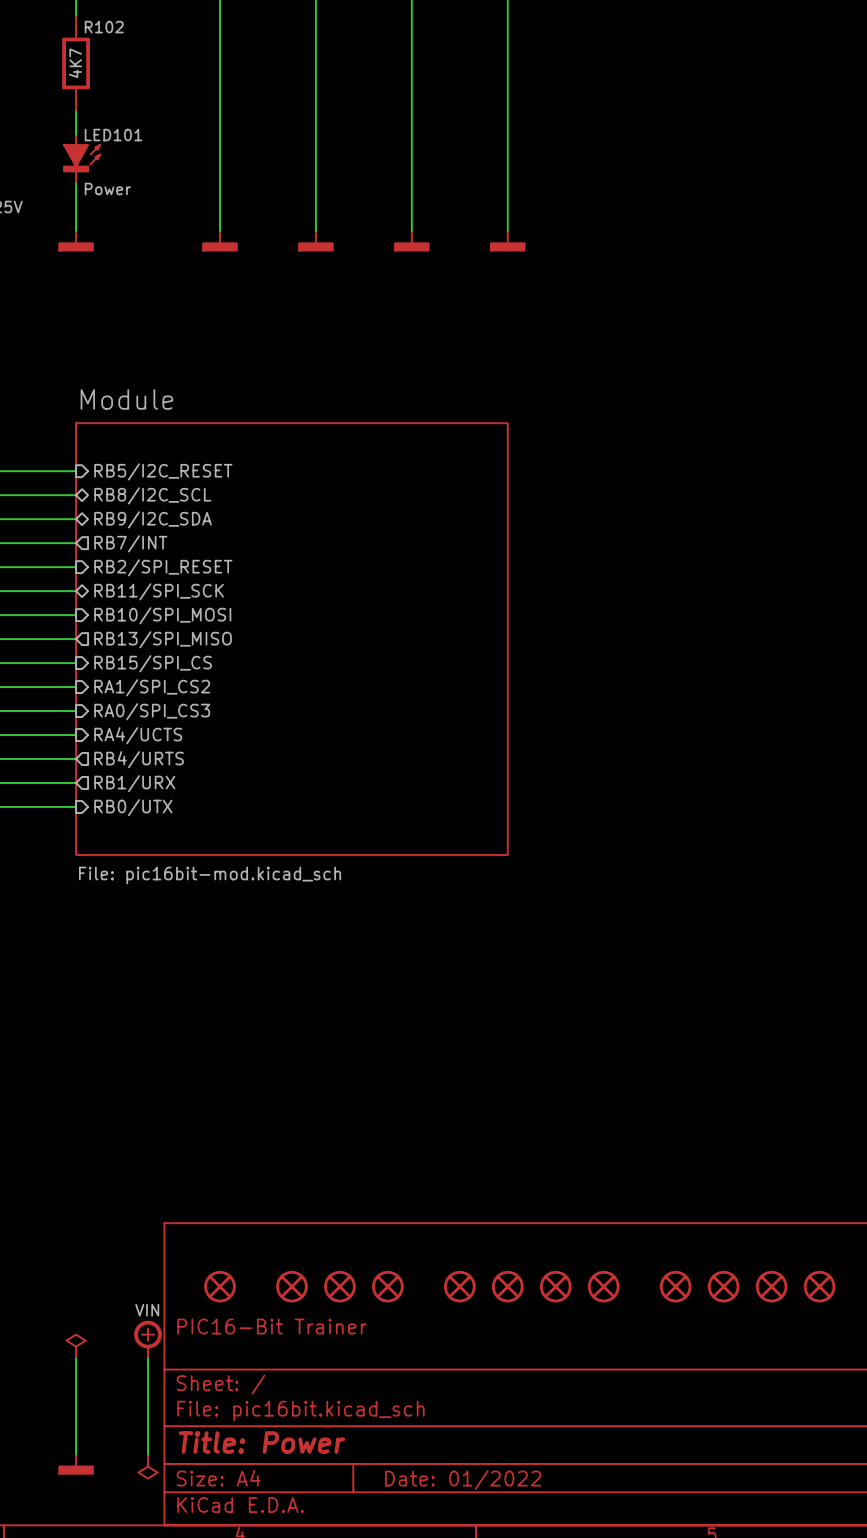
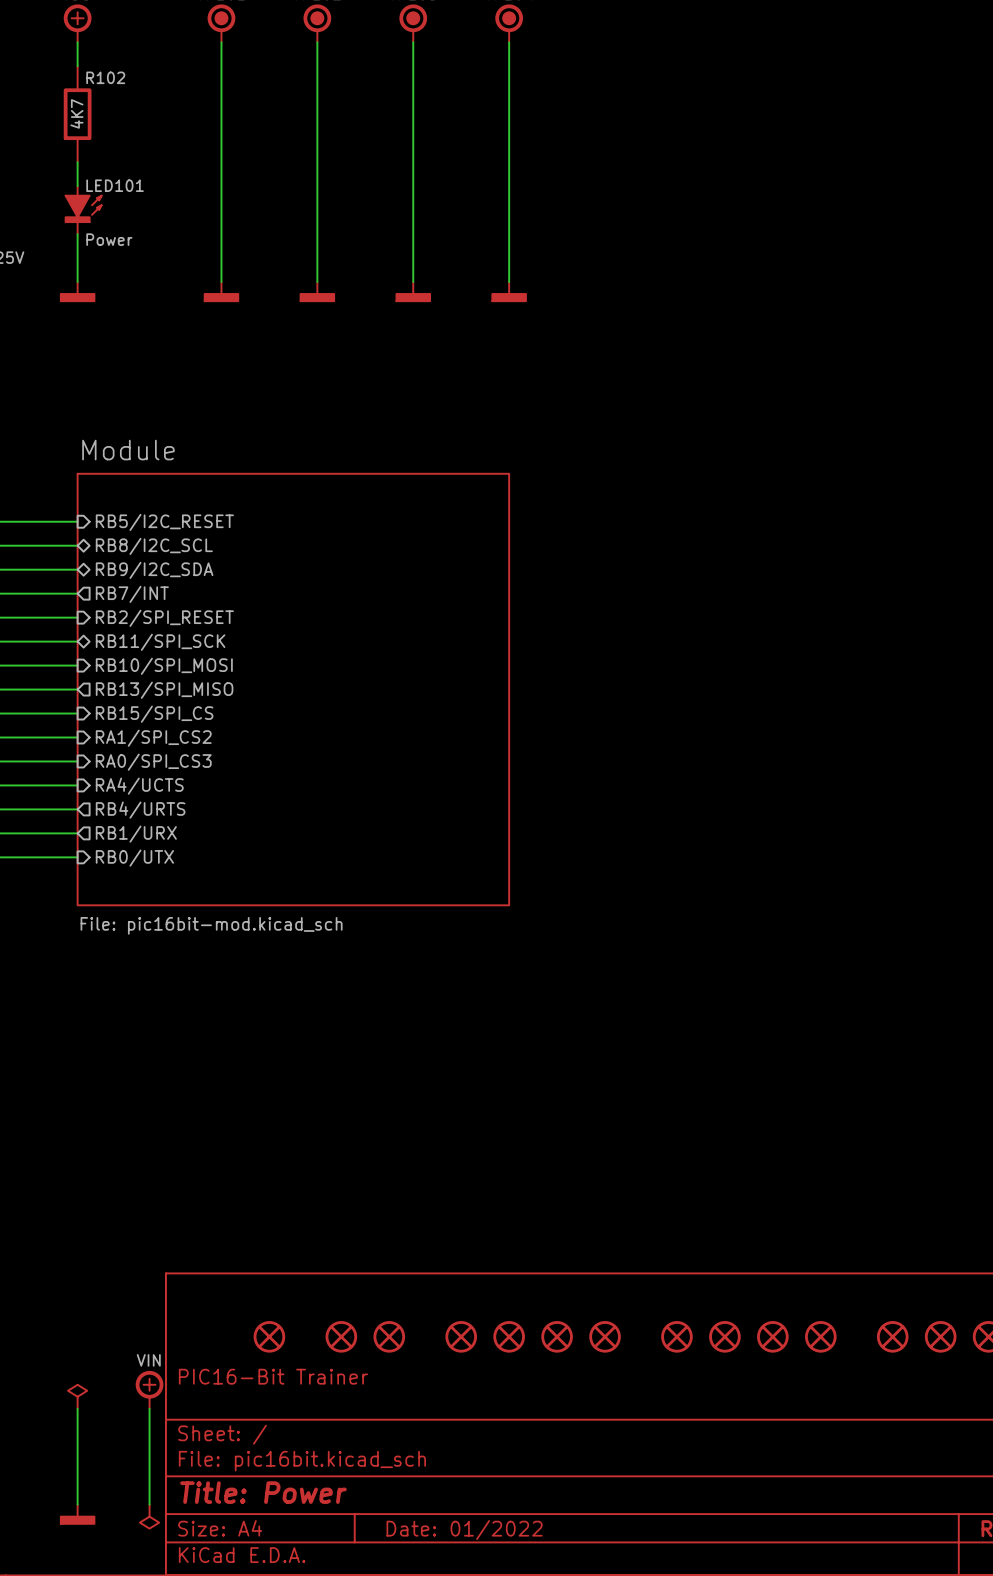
part: (219, 1286) -> none
part: none -> (269, 1336)
part: (291, 1286) -> none

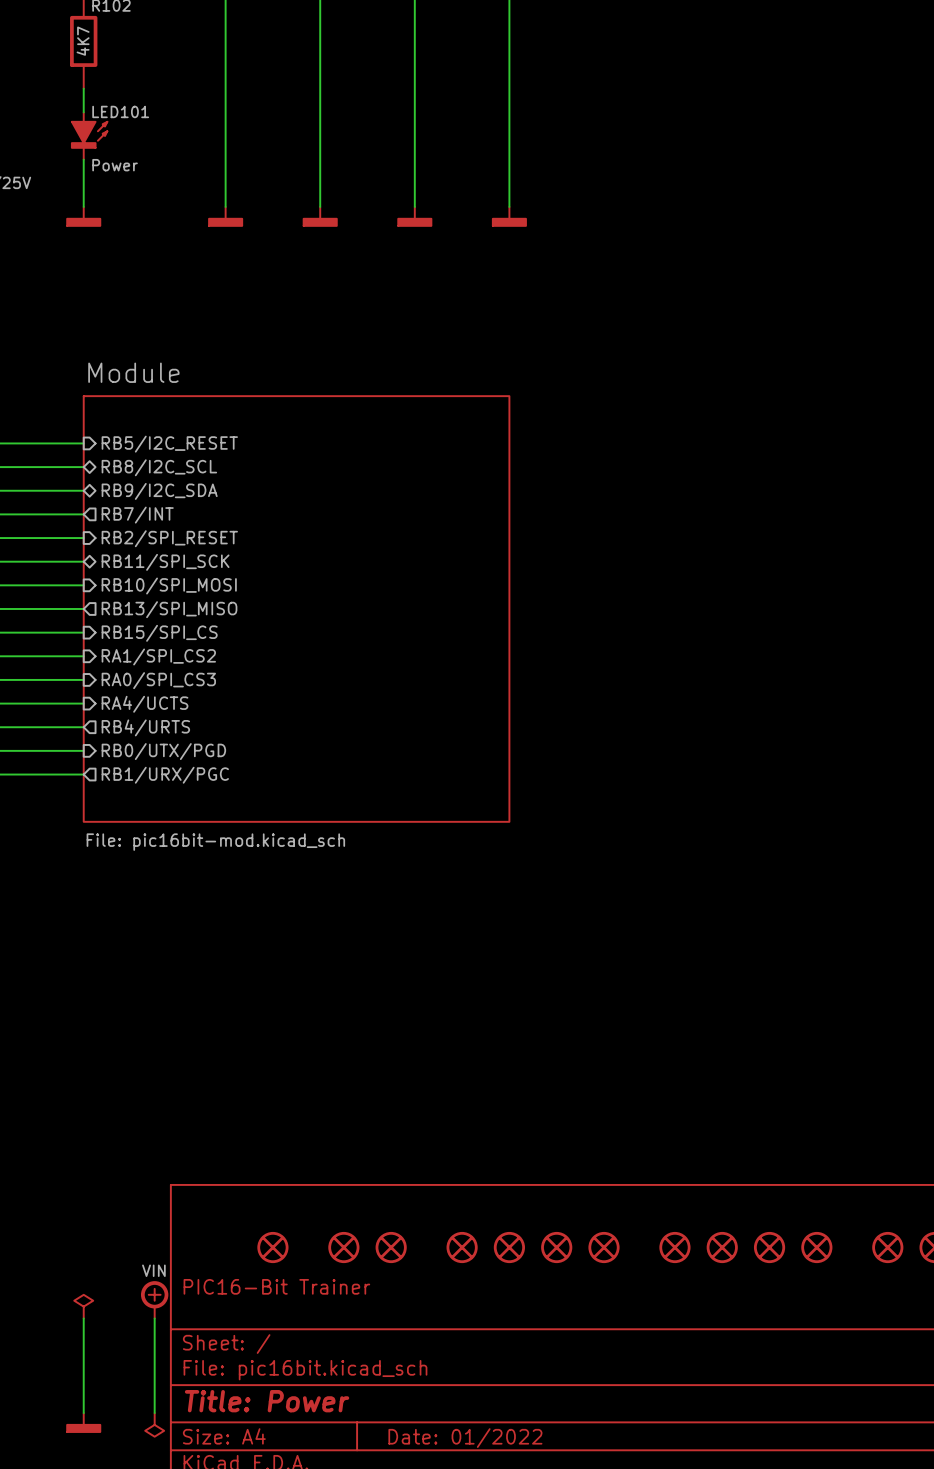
sheet pin shape: output (136, 834) -> input (163, 751)
sheet pin: RB1/URX (136, 834) -> RB0/UTX/PGD (163, 751)
sheet pin shape: input (134, 858) -> output (165, 775)
sheet pin: RB0/UTX (134, 858) -> RB1/URX/PGC (165, 775)

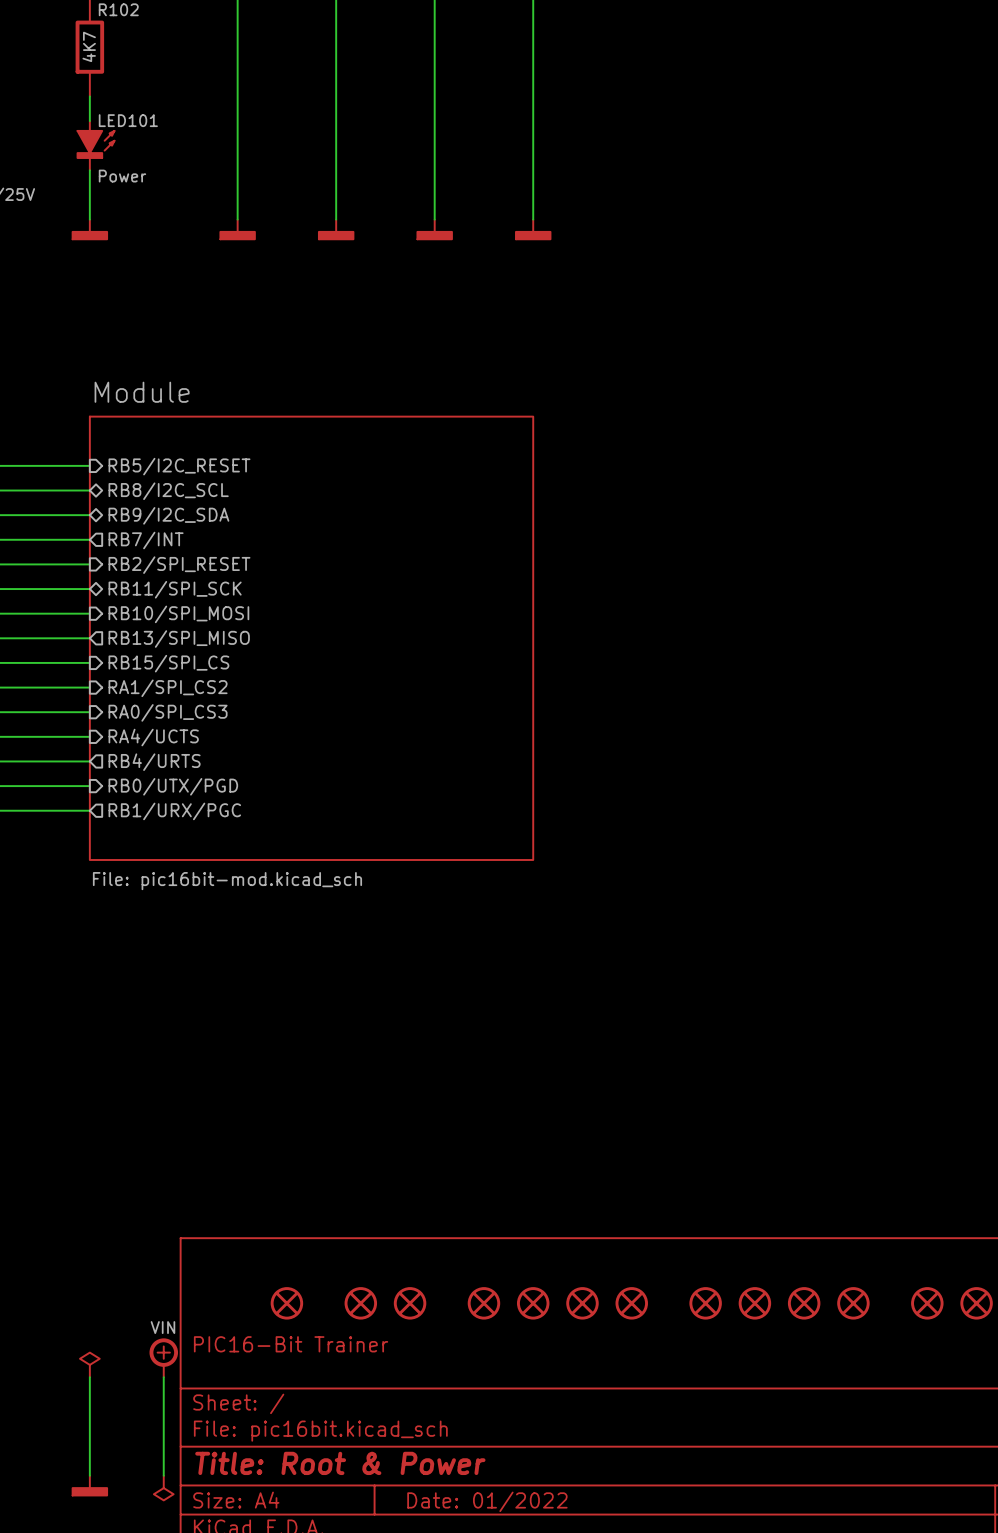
title block: Title: Power (267, 1401) -> Title: Root & Power (340, 1463)

